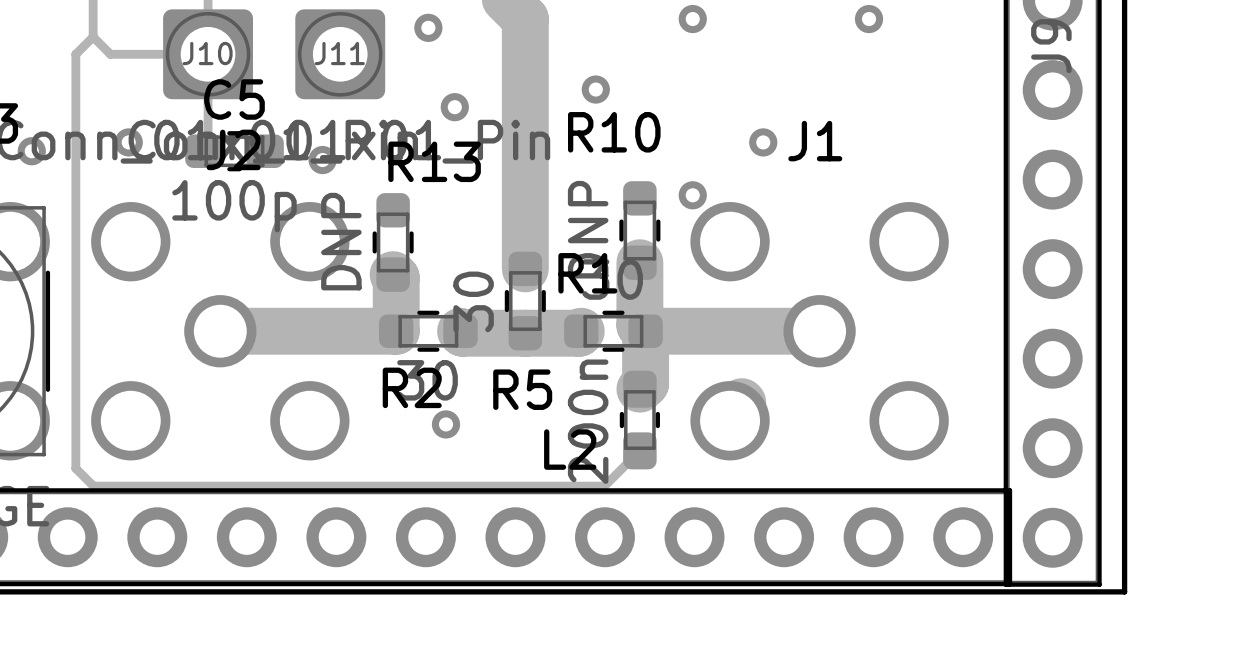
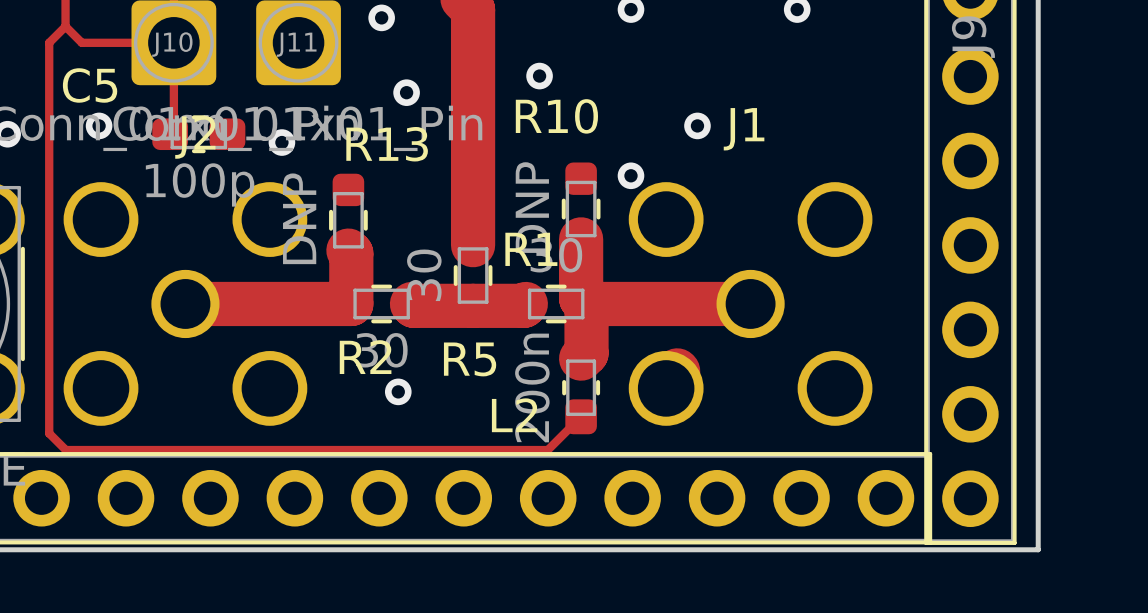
C5 name position: C5 (234, 99) -> C5 (90, 85)

